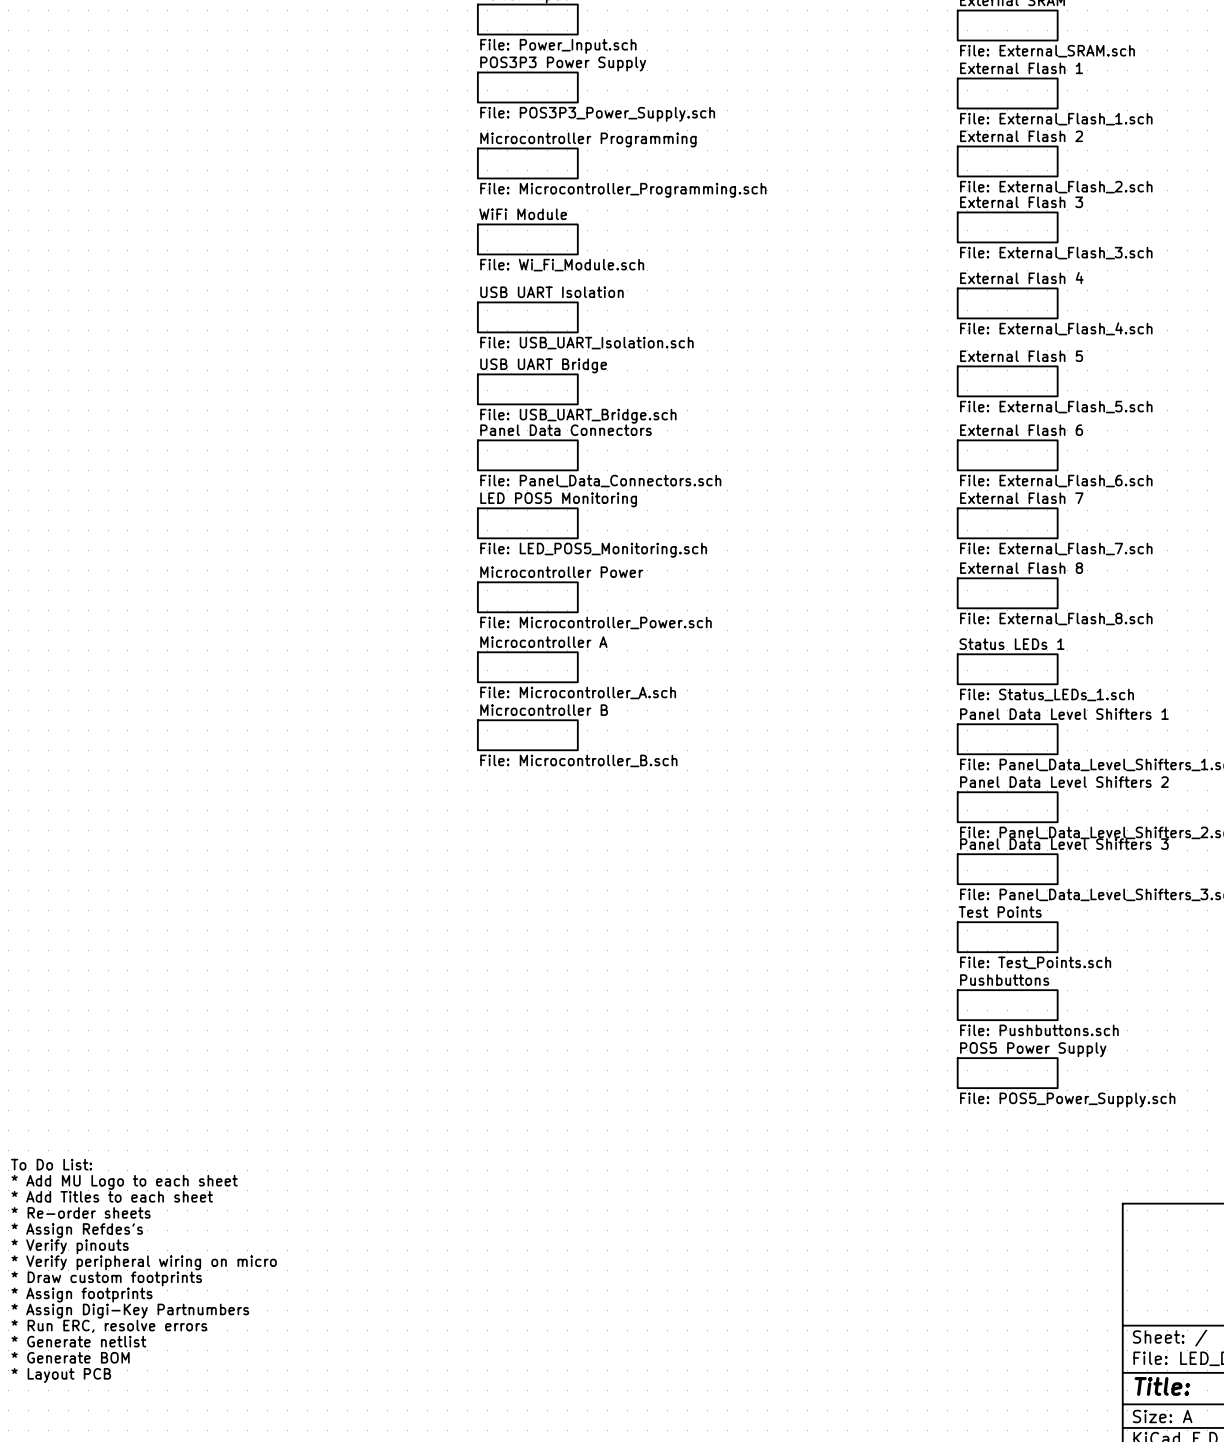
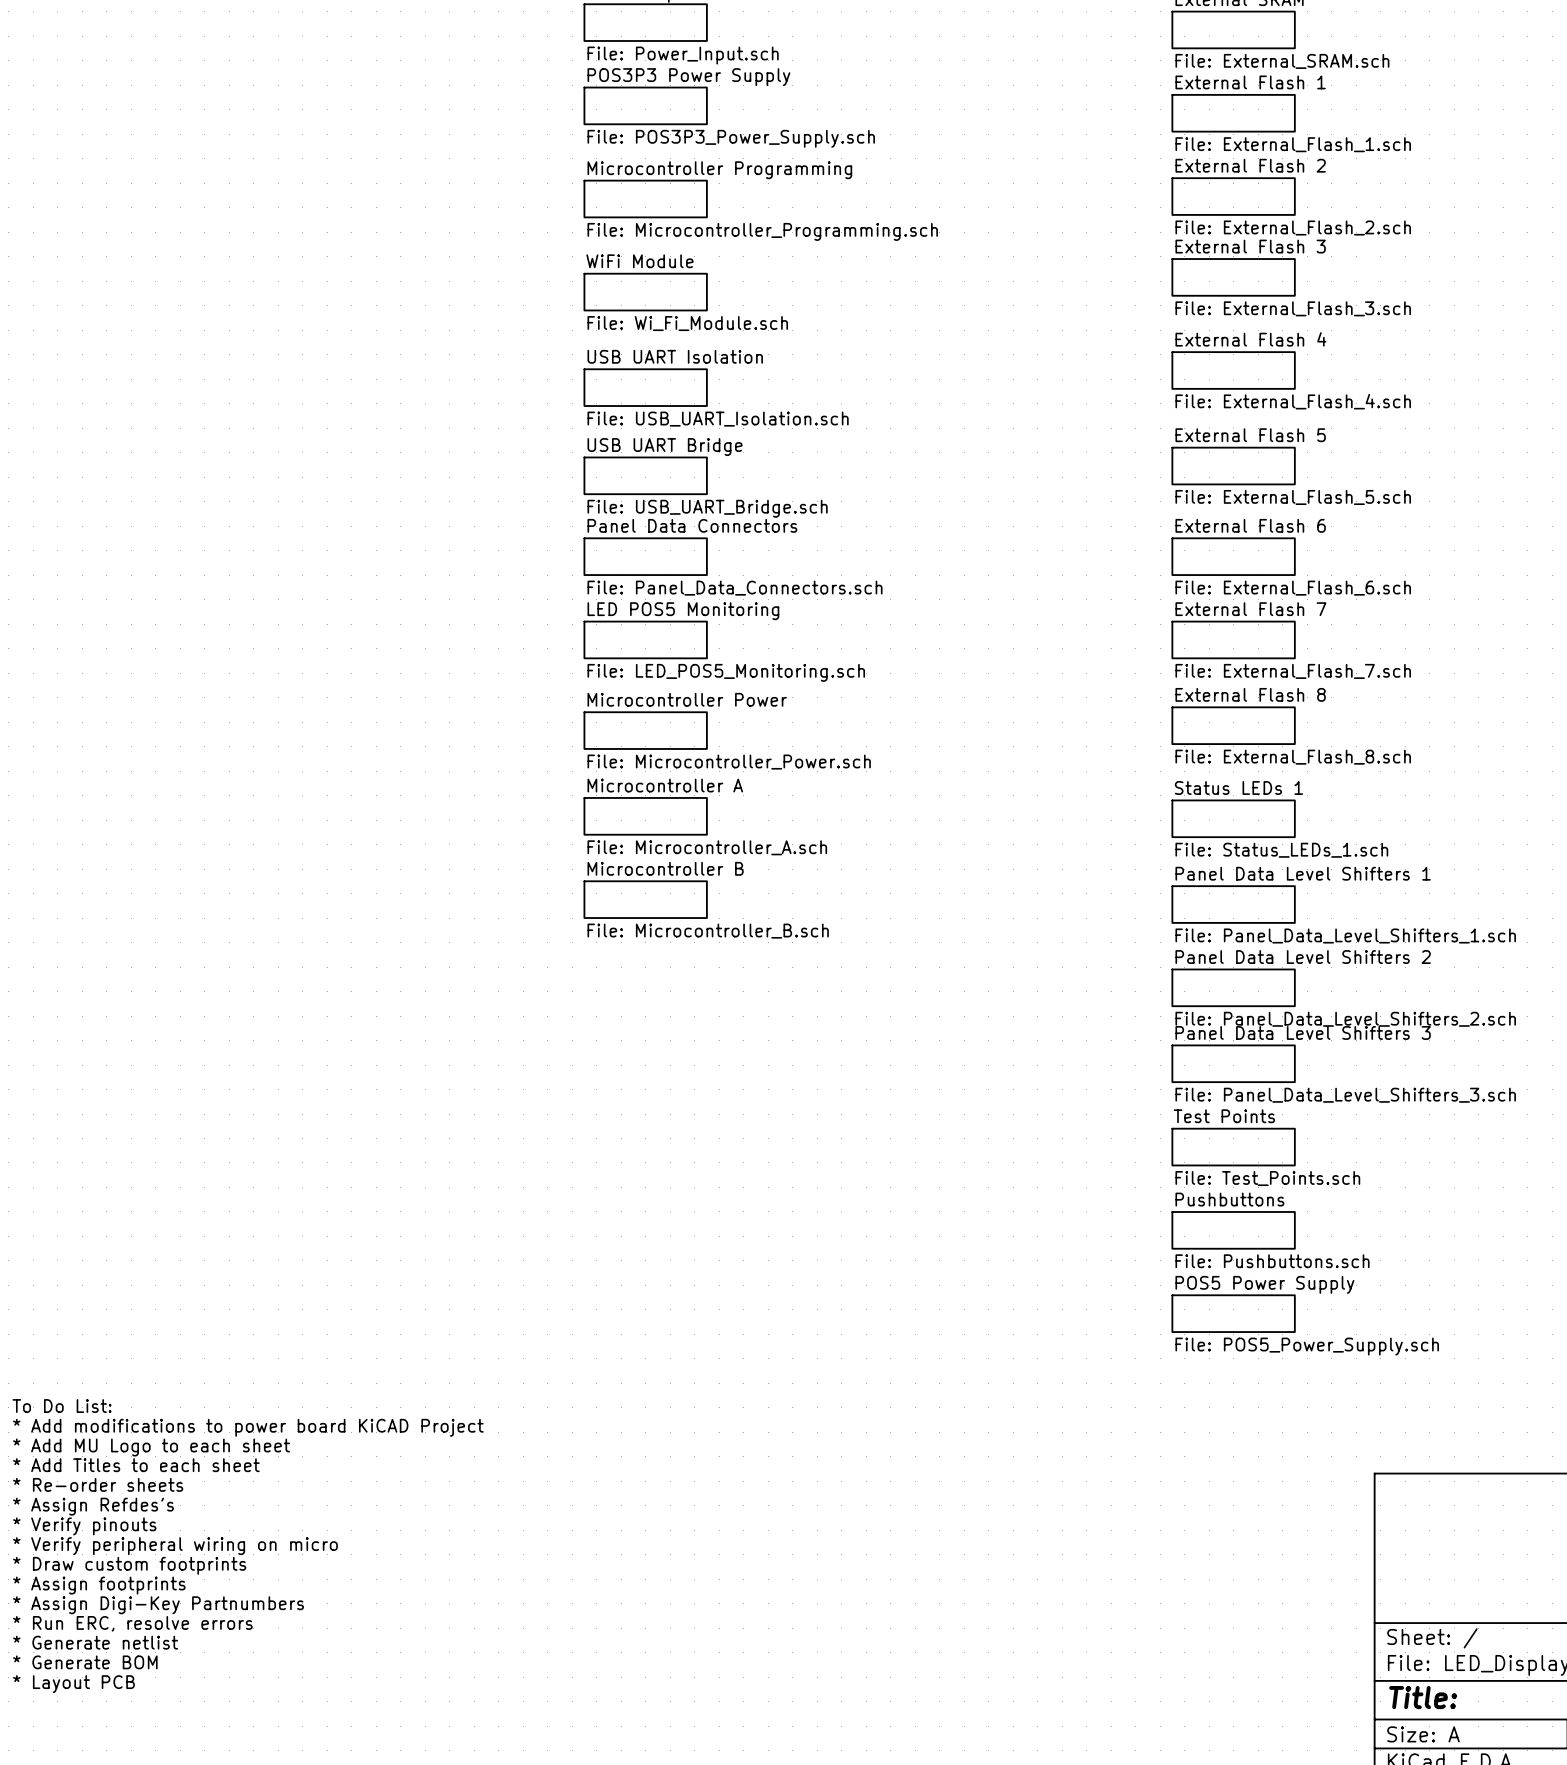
text: none -> To Do List: (62, 1406)
text: To Do List: (51, 1164) -> * Add modifications to power board KiCAD Project (248, 1427)

